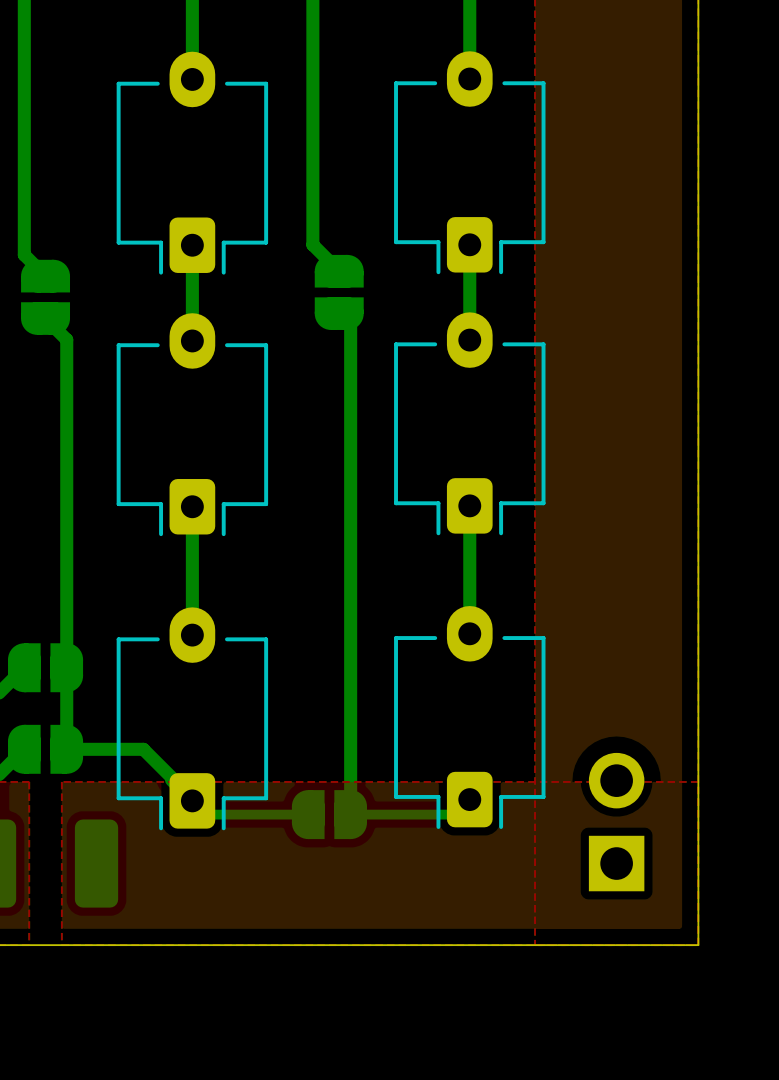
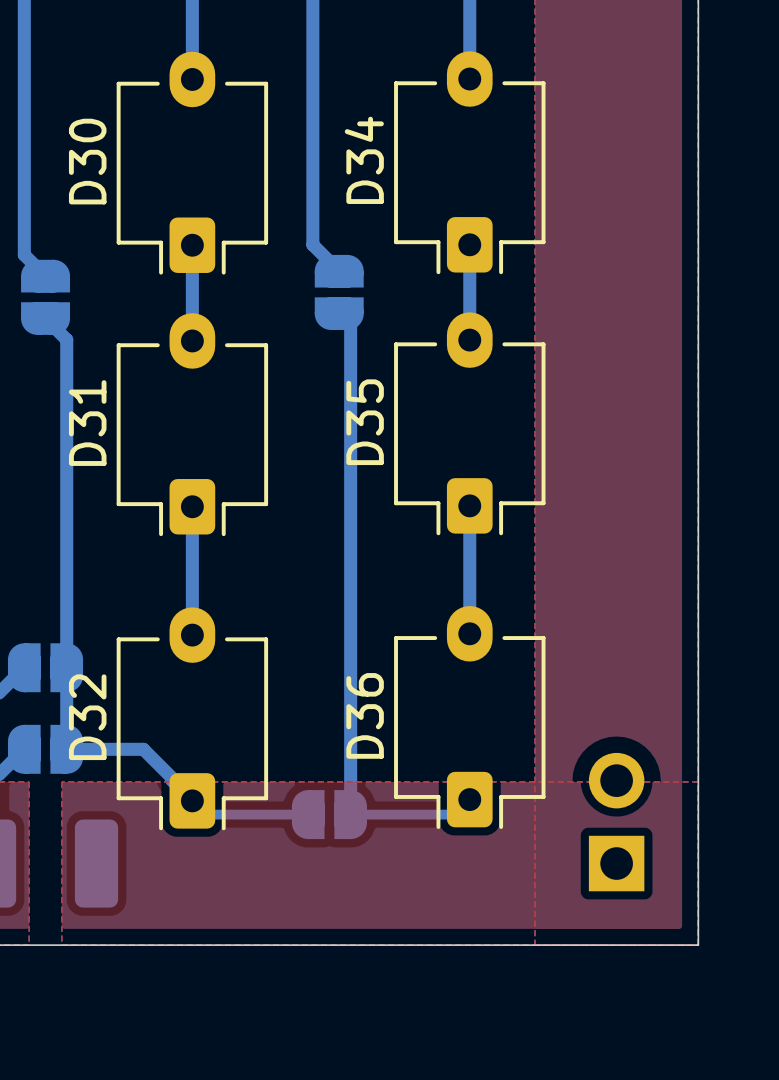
D34 name: none -> D34 (364, 160)
D30 name: none -> D30 (87, 161)
D35 name: none -> D35 (365, 422)
D31 name: none -> D31 (87, 423)
D36 name: none -> D36 (365, 715)
D32 name: none -> D32 (87, 717)

